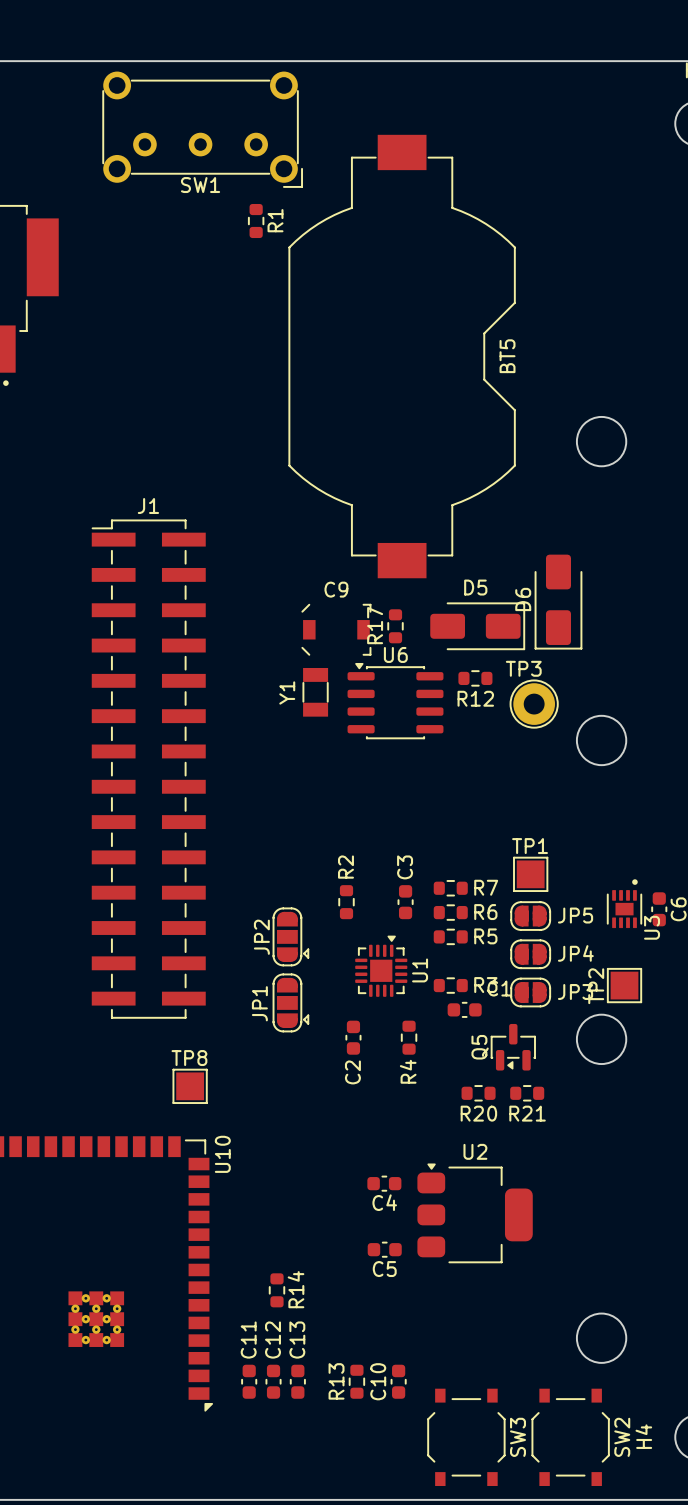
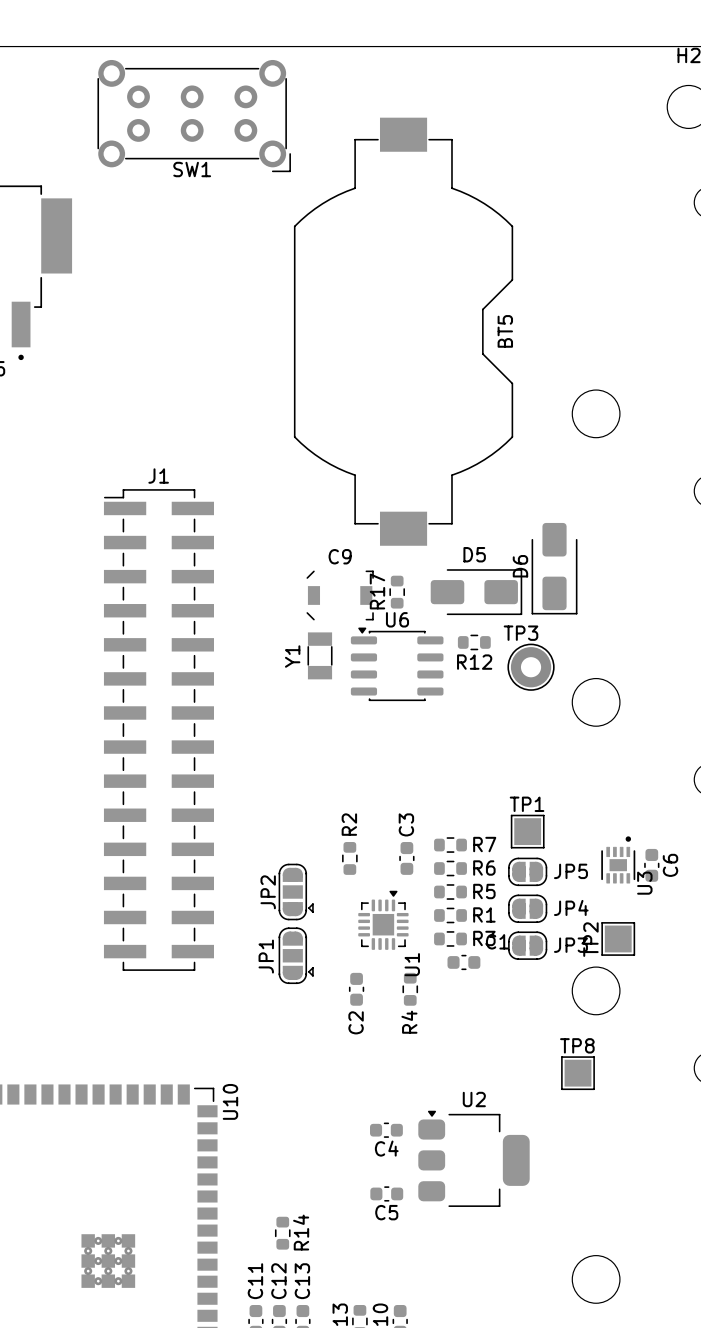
SW1 footprint: [102, 71, 303, 188] -> [97, 59, 291, 173]
R1 rotation: 0° (256, 221) -> 90° clockwise (450, 915)
R1 position: (256, 221) -> (450, 915)
U1 name position: U1 (420, 970) -> U1 (412, 964)
Q5: (513, 1047) -> none
TP8 position: (190, 1086) -> (578, 1073)
R20: (478, 1093) -> none
R21: (527, 1093) -> none

